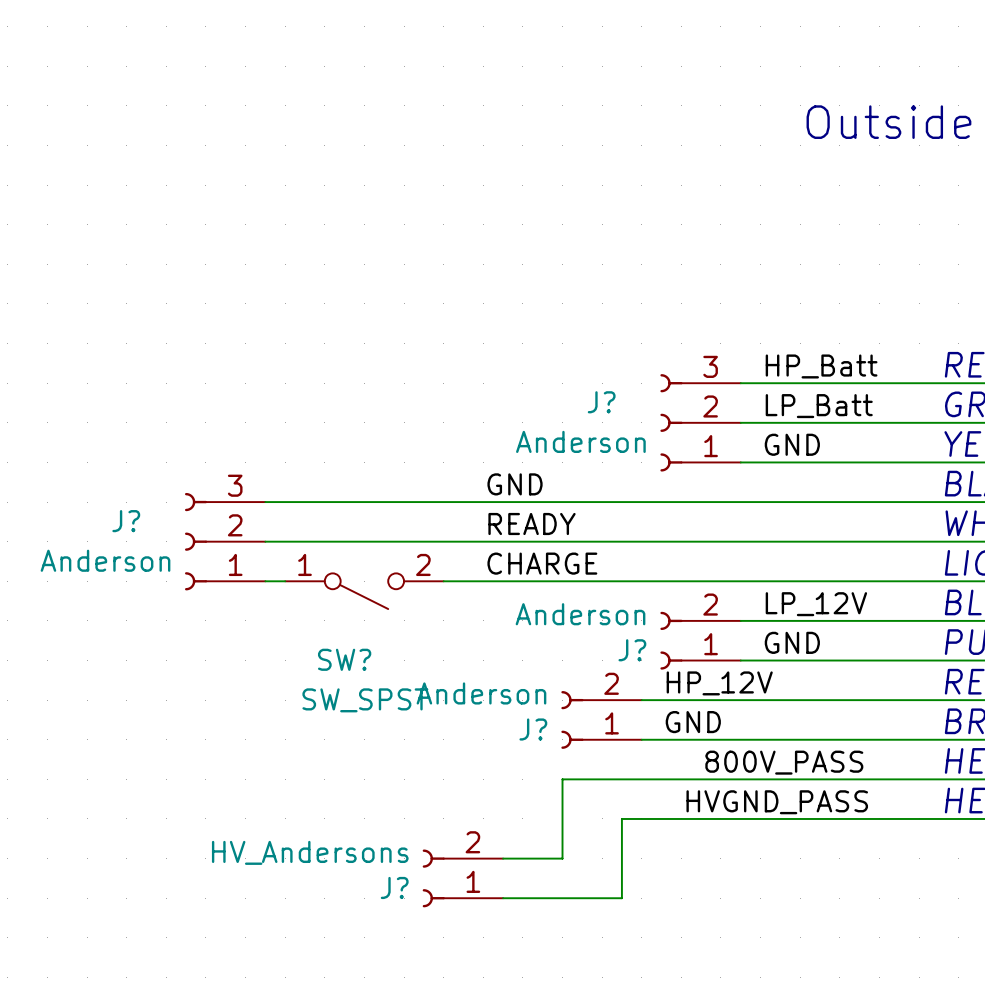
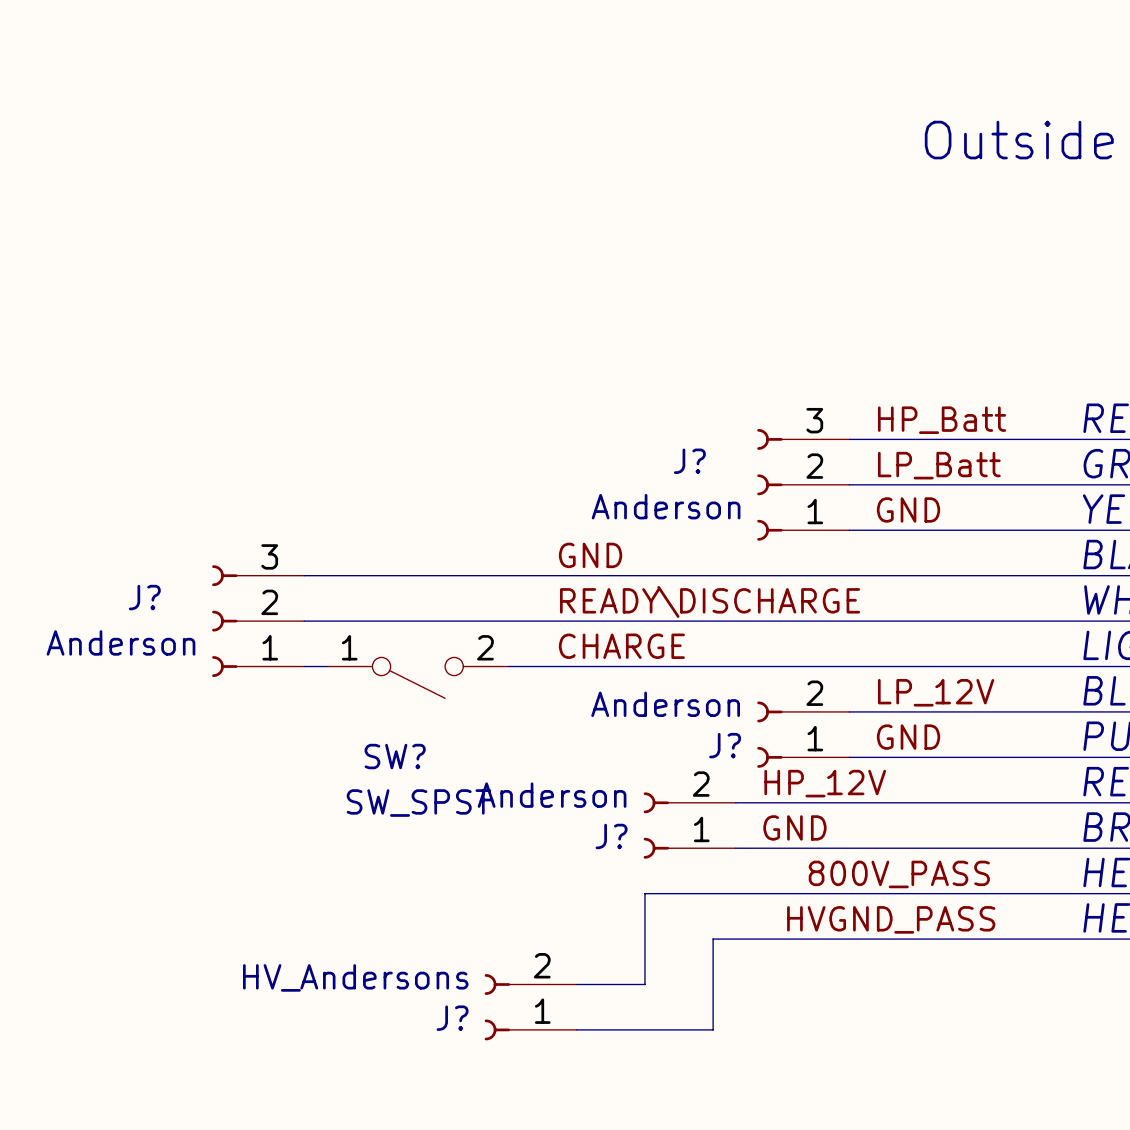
label: READY (532, 524) -> READY\DISCHARGE (710, 601)

